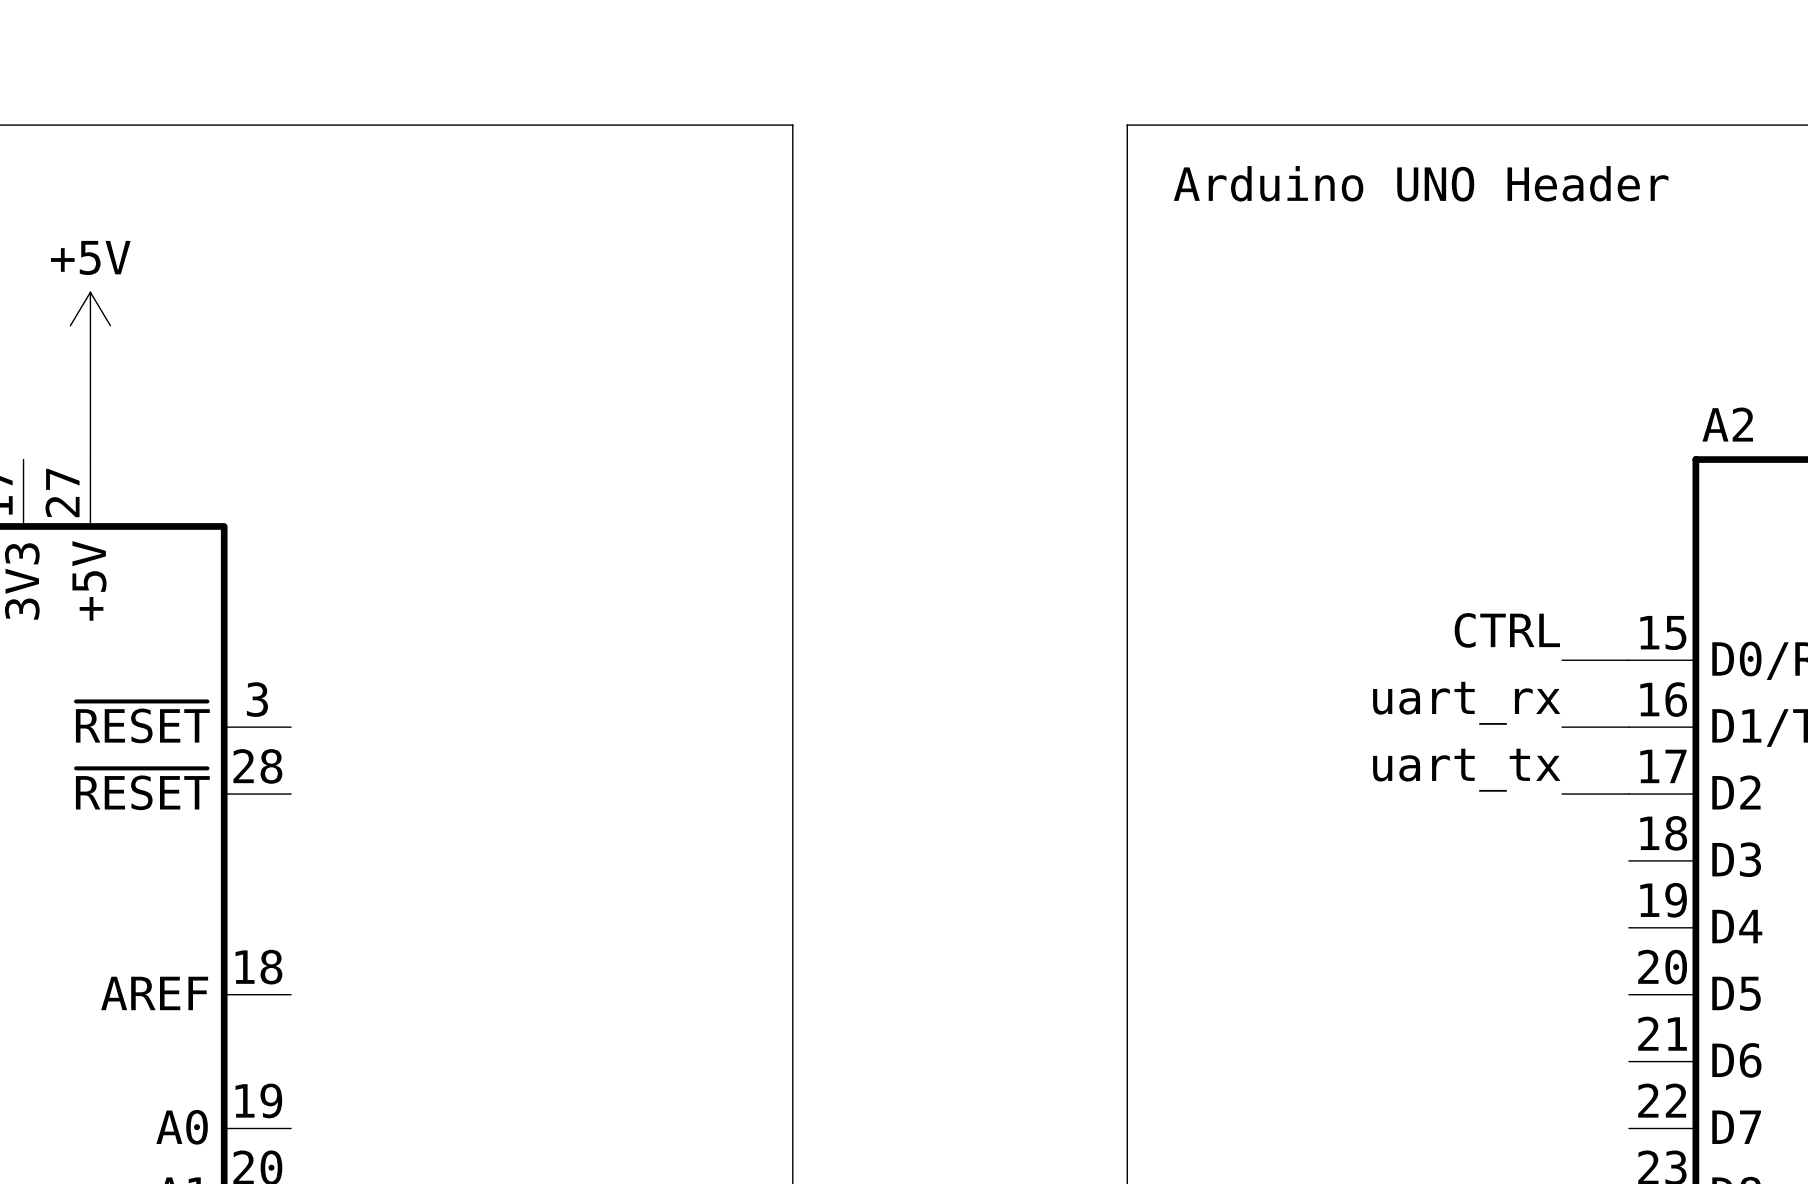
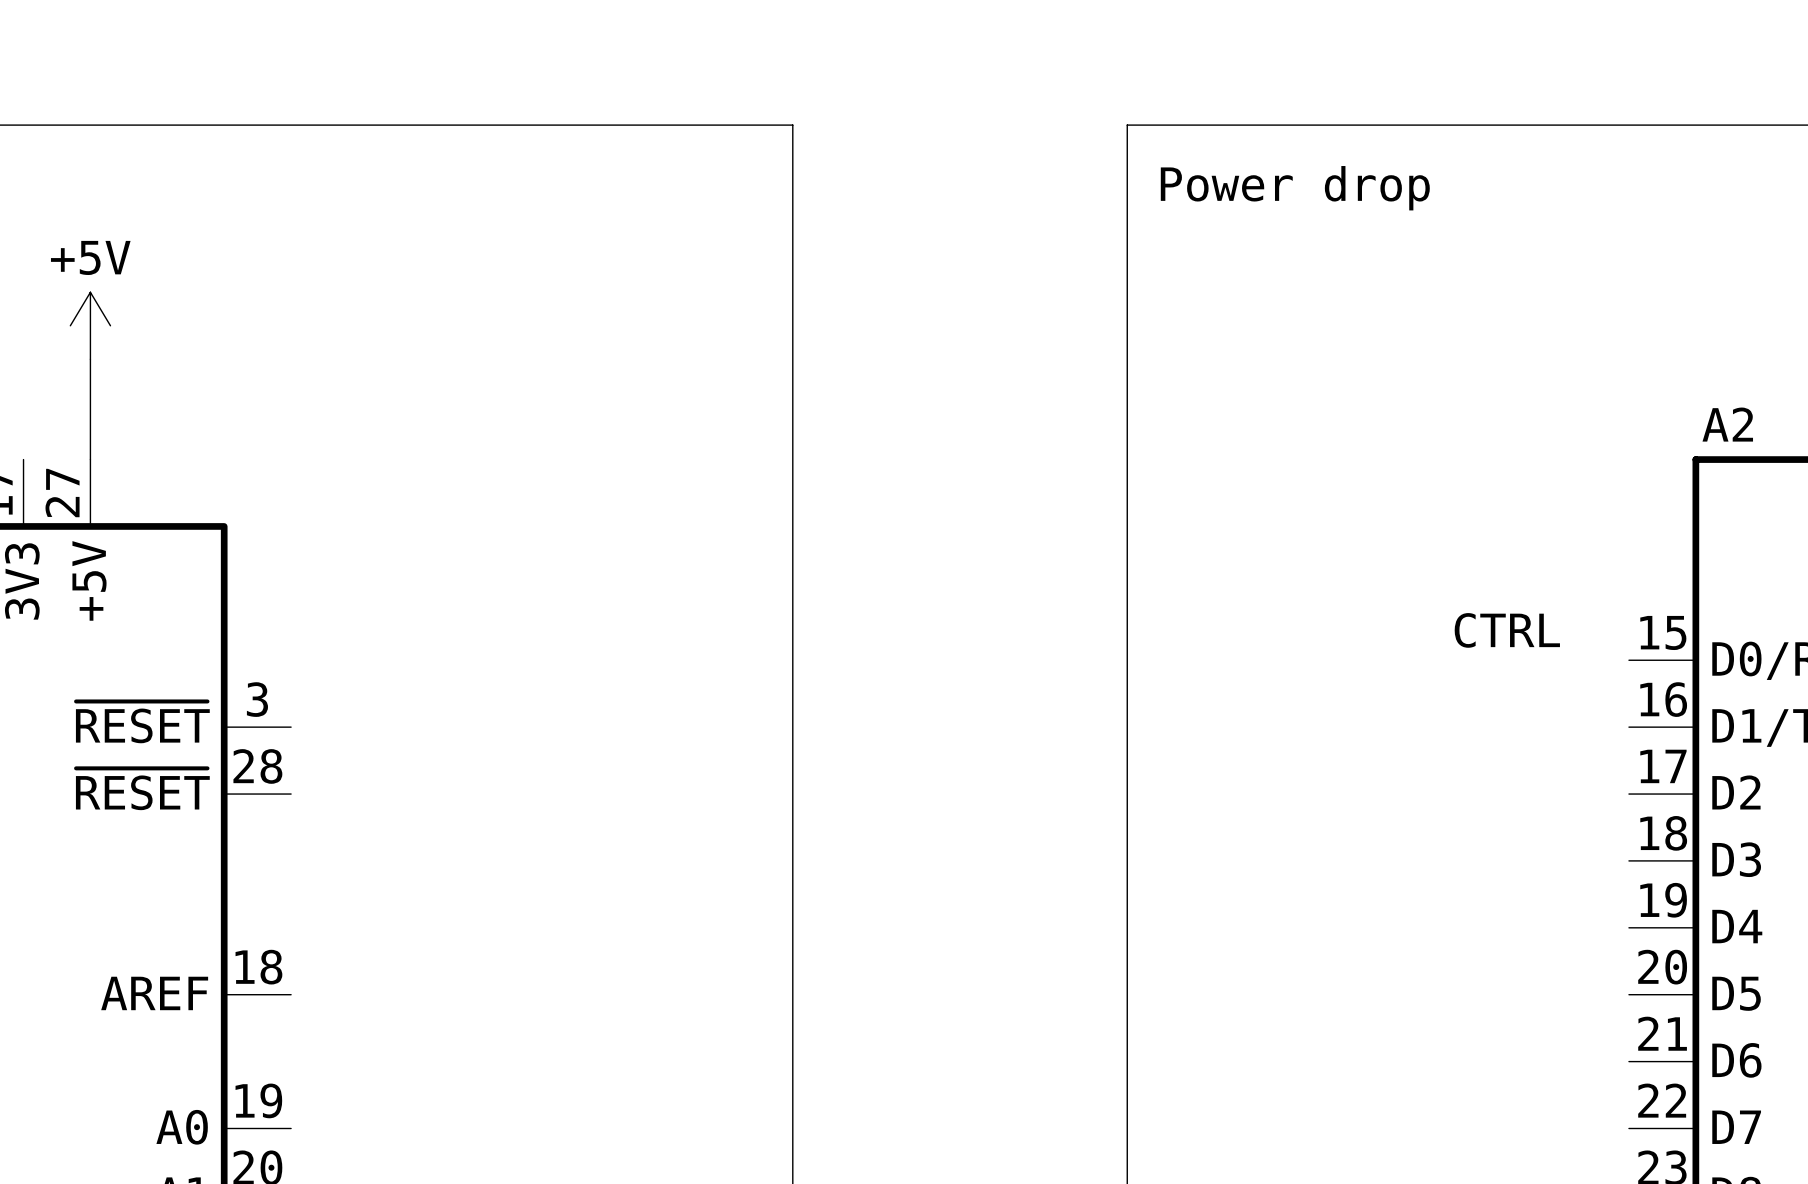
text: Arduino UNO Header (1421, 183) -> none
text: none -> Power drop (1295, 188)
wire: (1562, 660) (1628, 660) -> none
label: uart_rx (1466, 703) -> none
wire: (1562, 727) (1628, 727) -> none
label: uart_tx (1466, 770) -> none
wire: (1562, 794) (1628, 794) -> none

